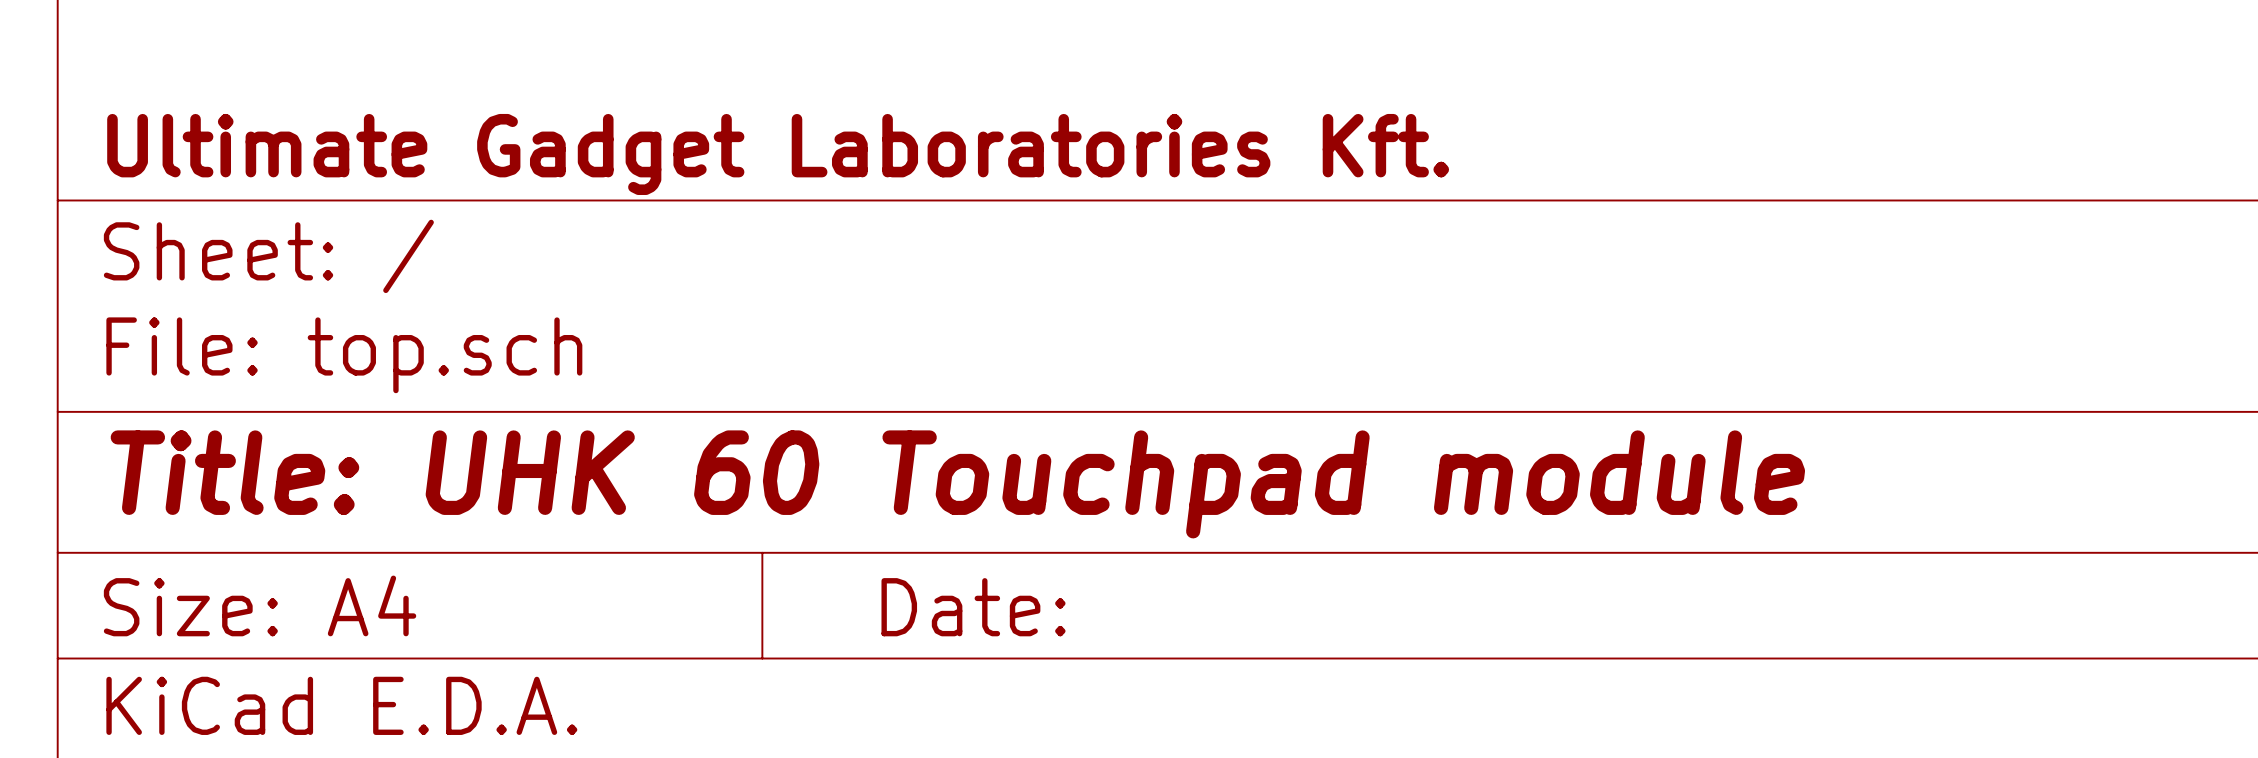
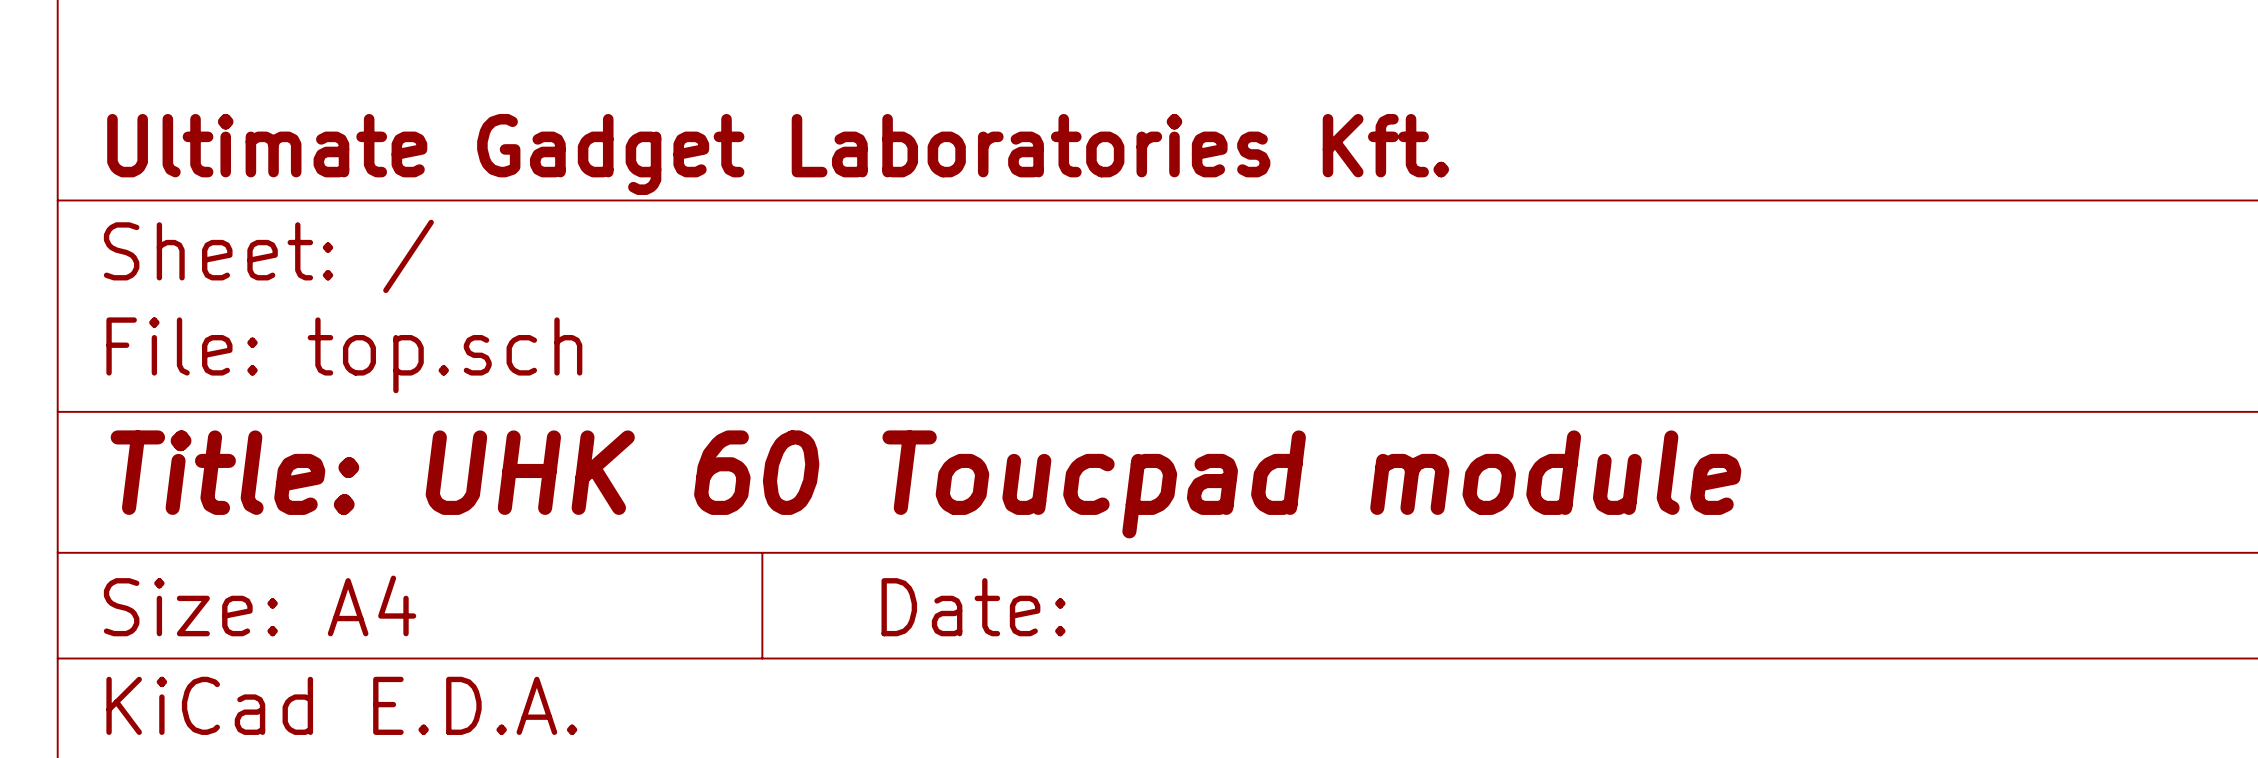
title block: Title: UHK 60 Touchpad module (957, 484) -> Title: UHK 60 Toucpad module (925, 484)

